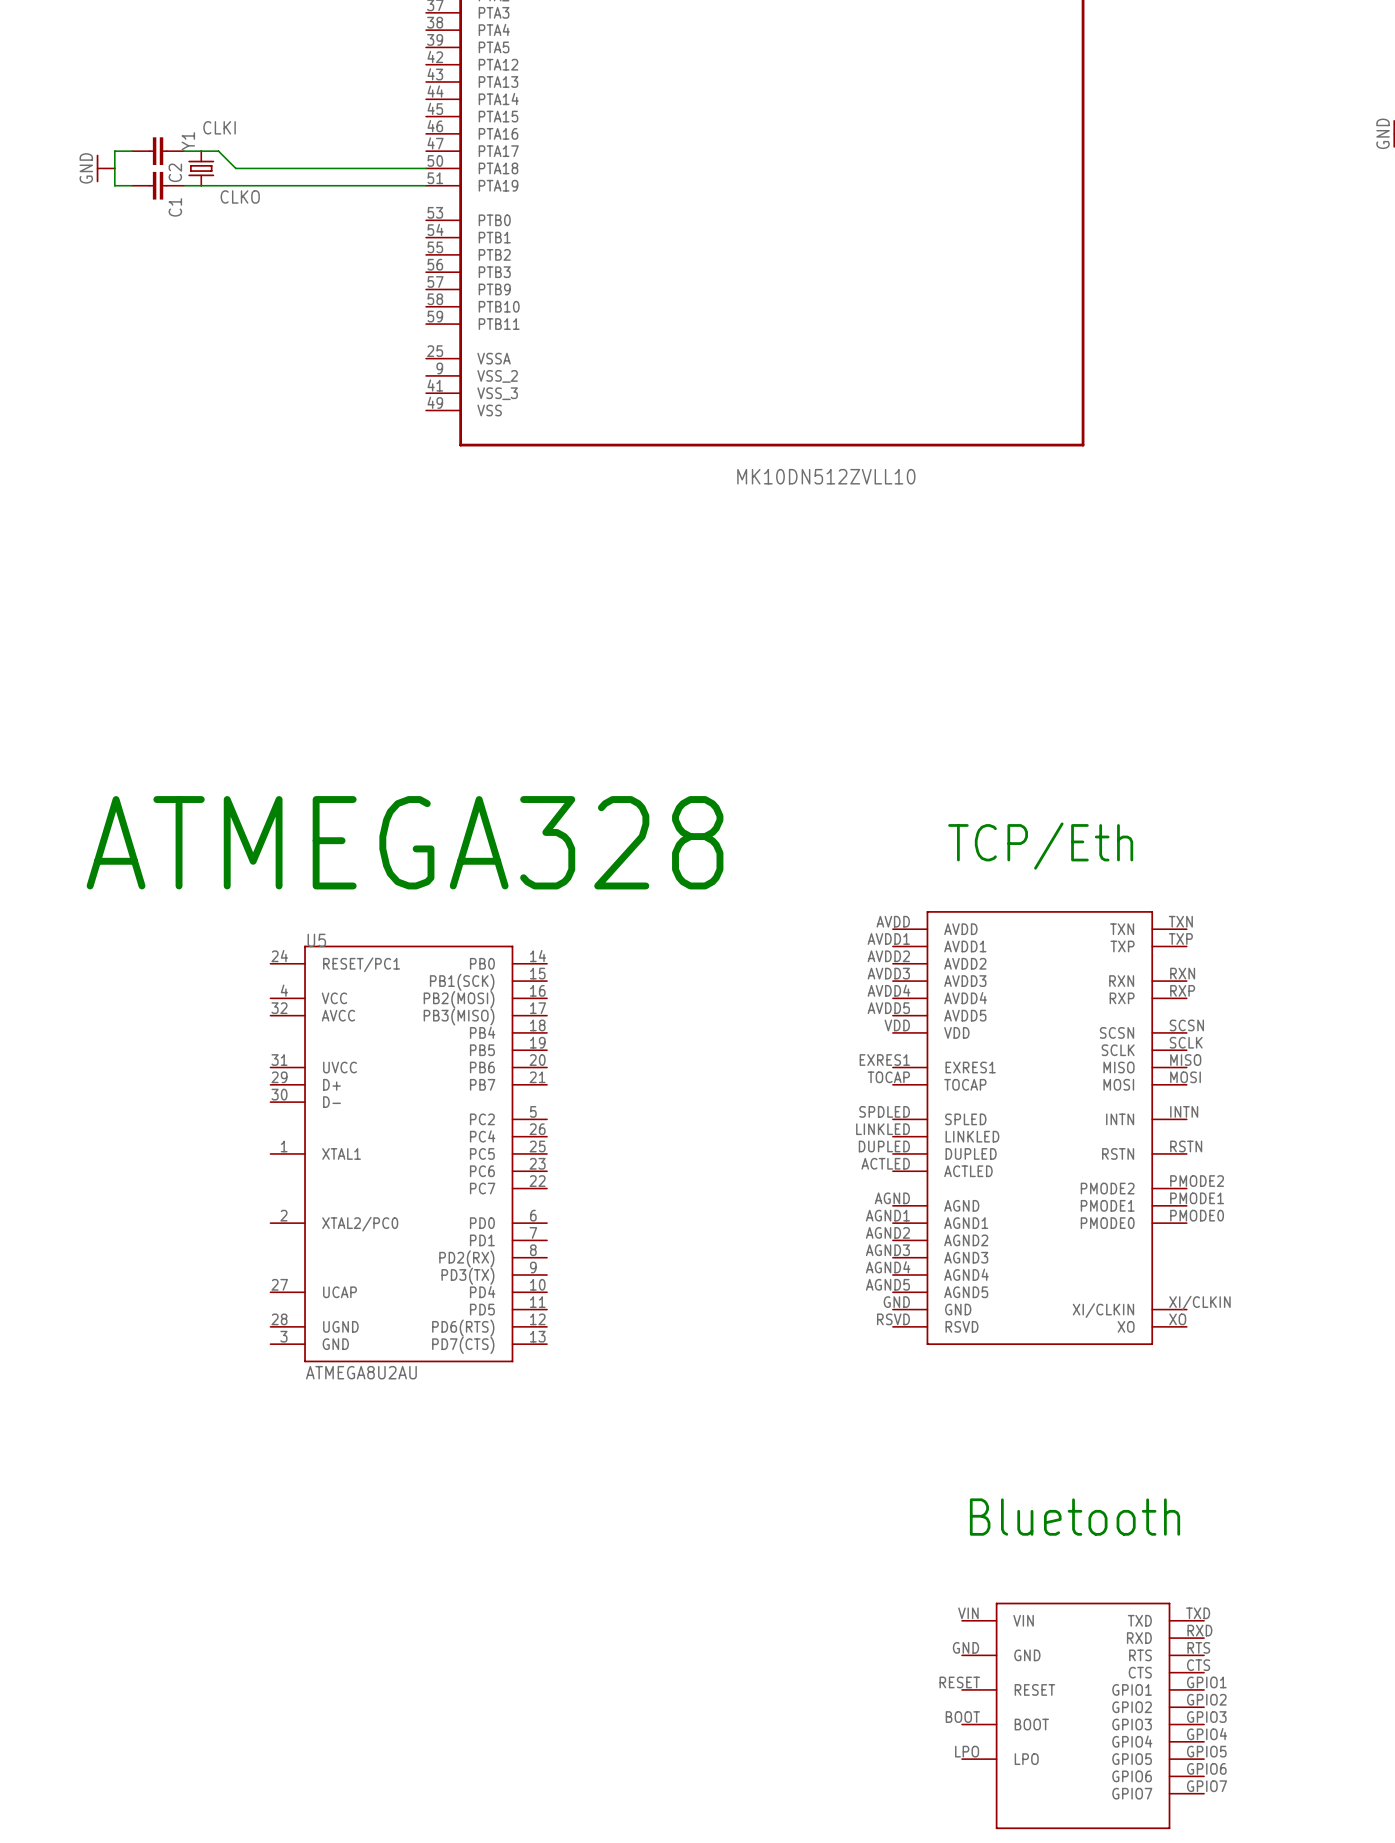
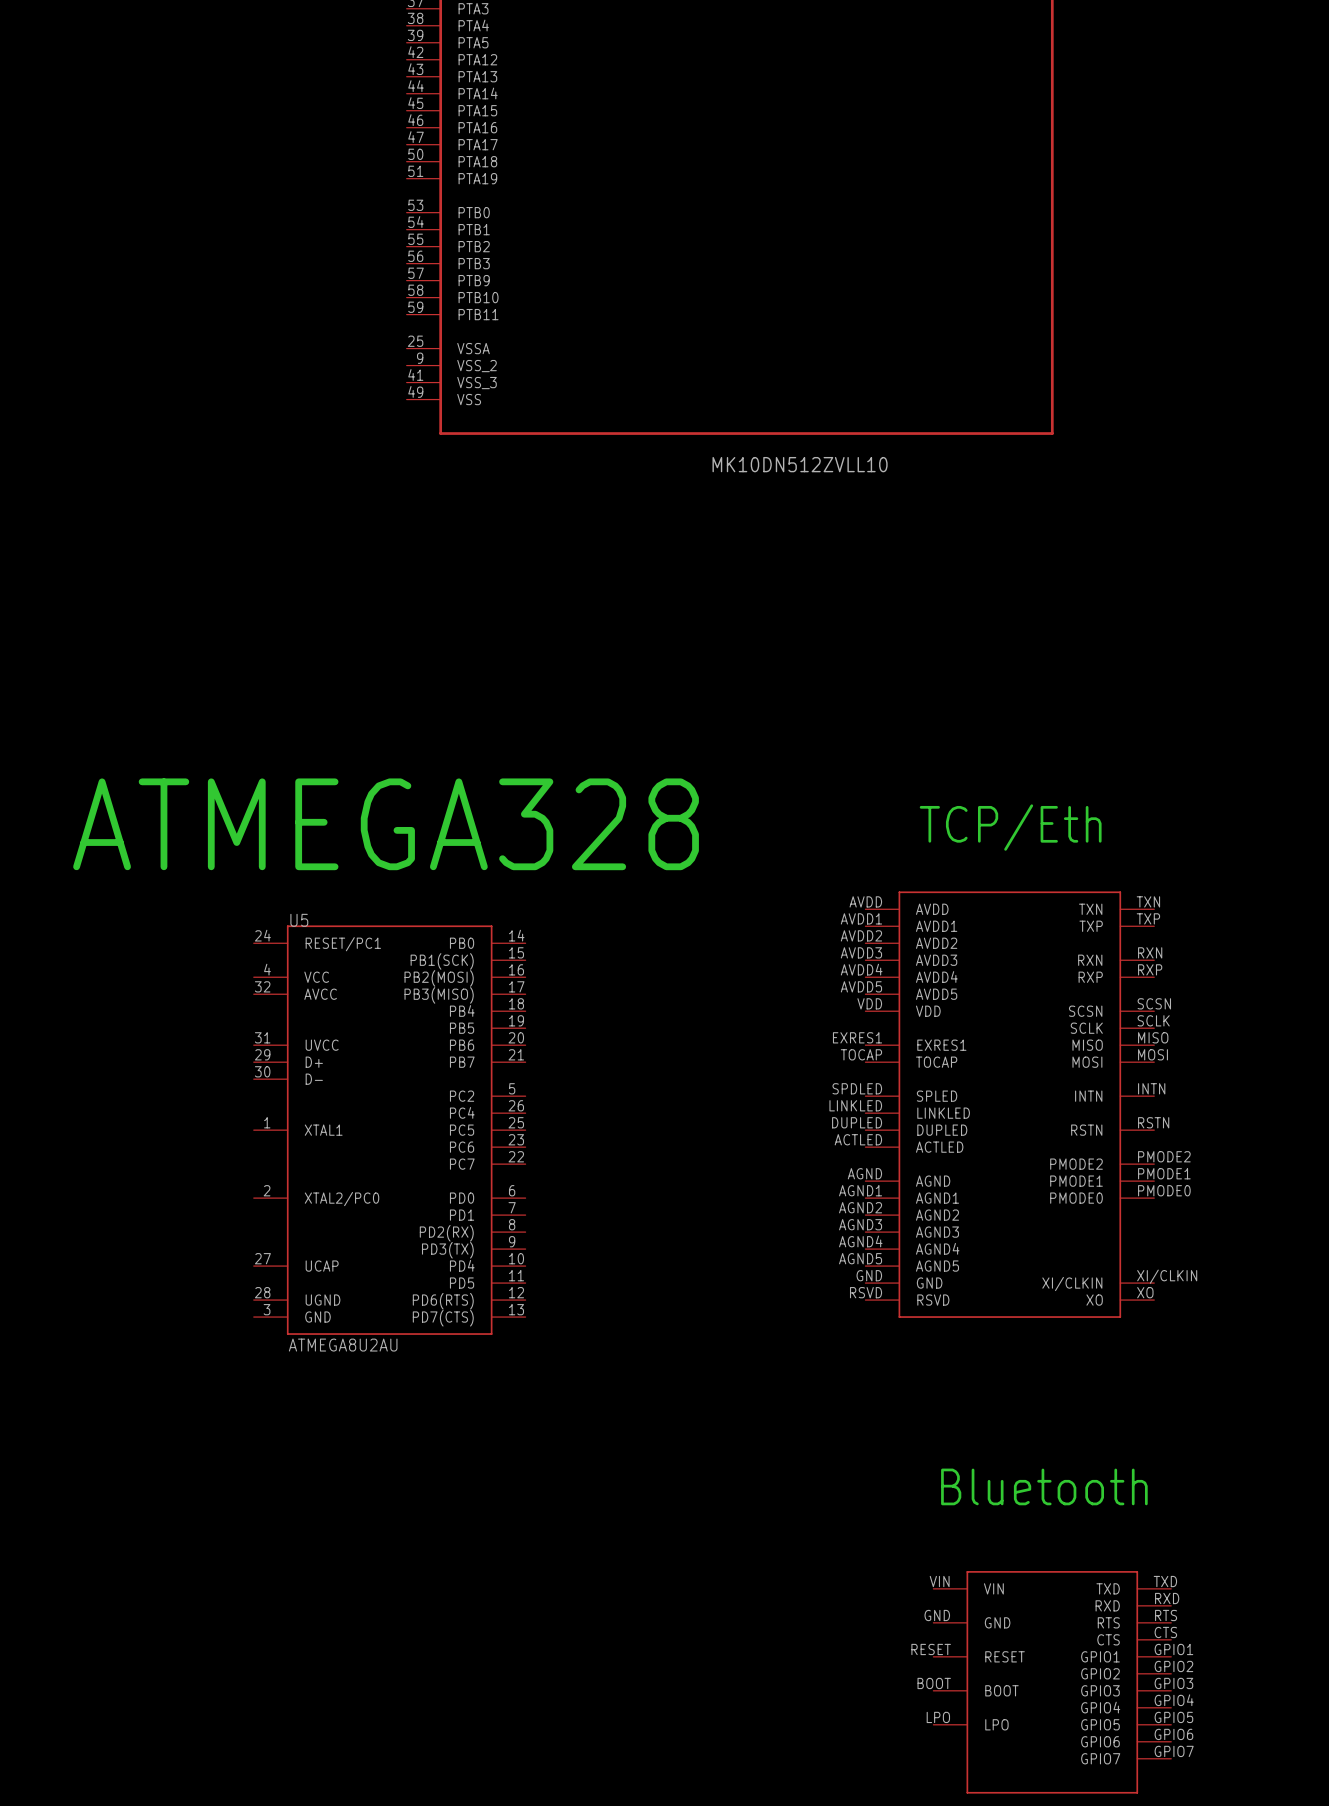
label: CLKI (219, 127) -> none
wire: (132, 151) (114, 151) (114, 185) (132, 185) -> none
C2: (158, 151) -> none
wire: (183, 151) (218, 151) (235, 168) (426, 168) -> none
power symbol: GND (105, 168) -> none
Y1: (201, 168) -> none
C1: (158, 185) -> none
wire: (183, 185) (426, 185) -> none
label: CLKO (240, 196) -> none

